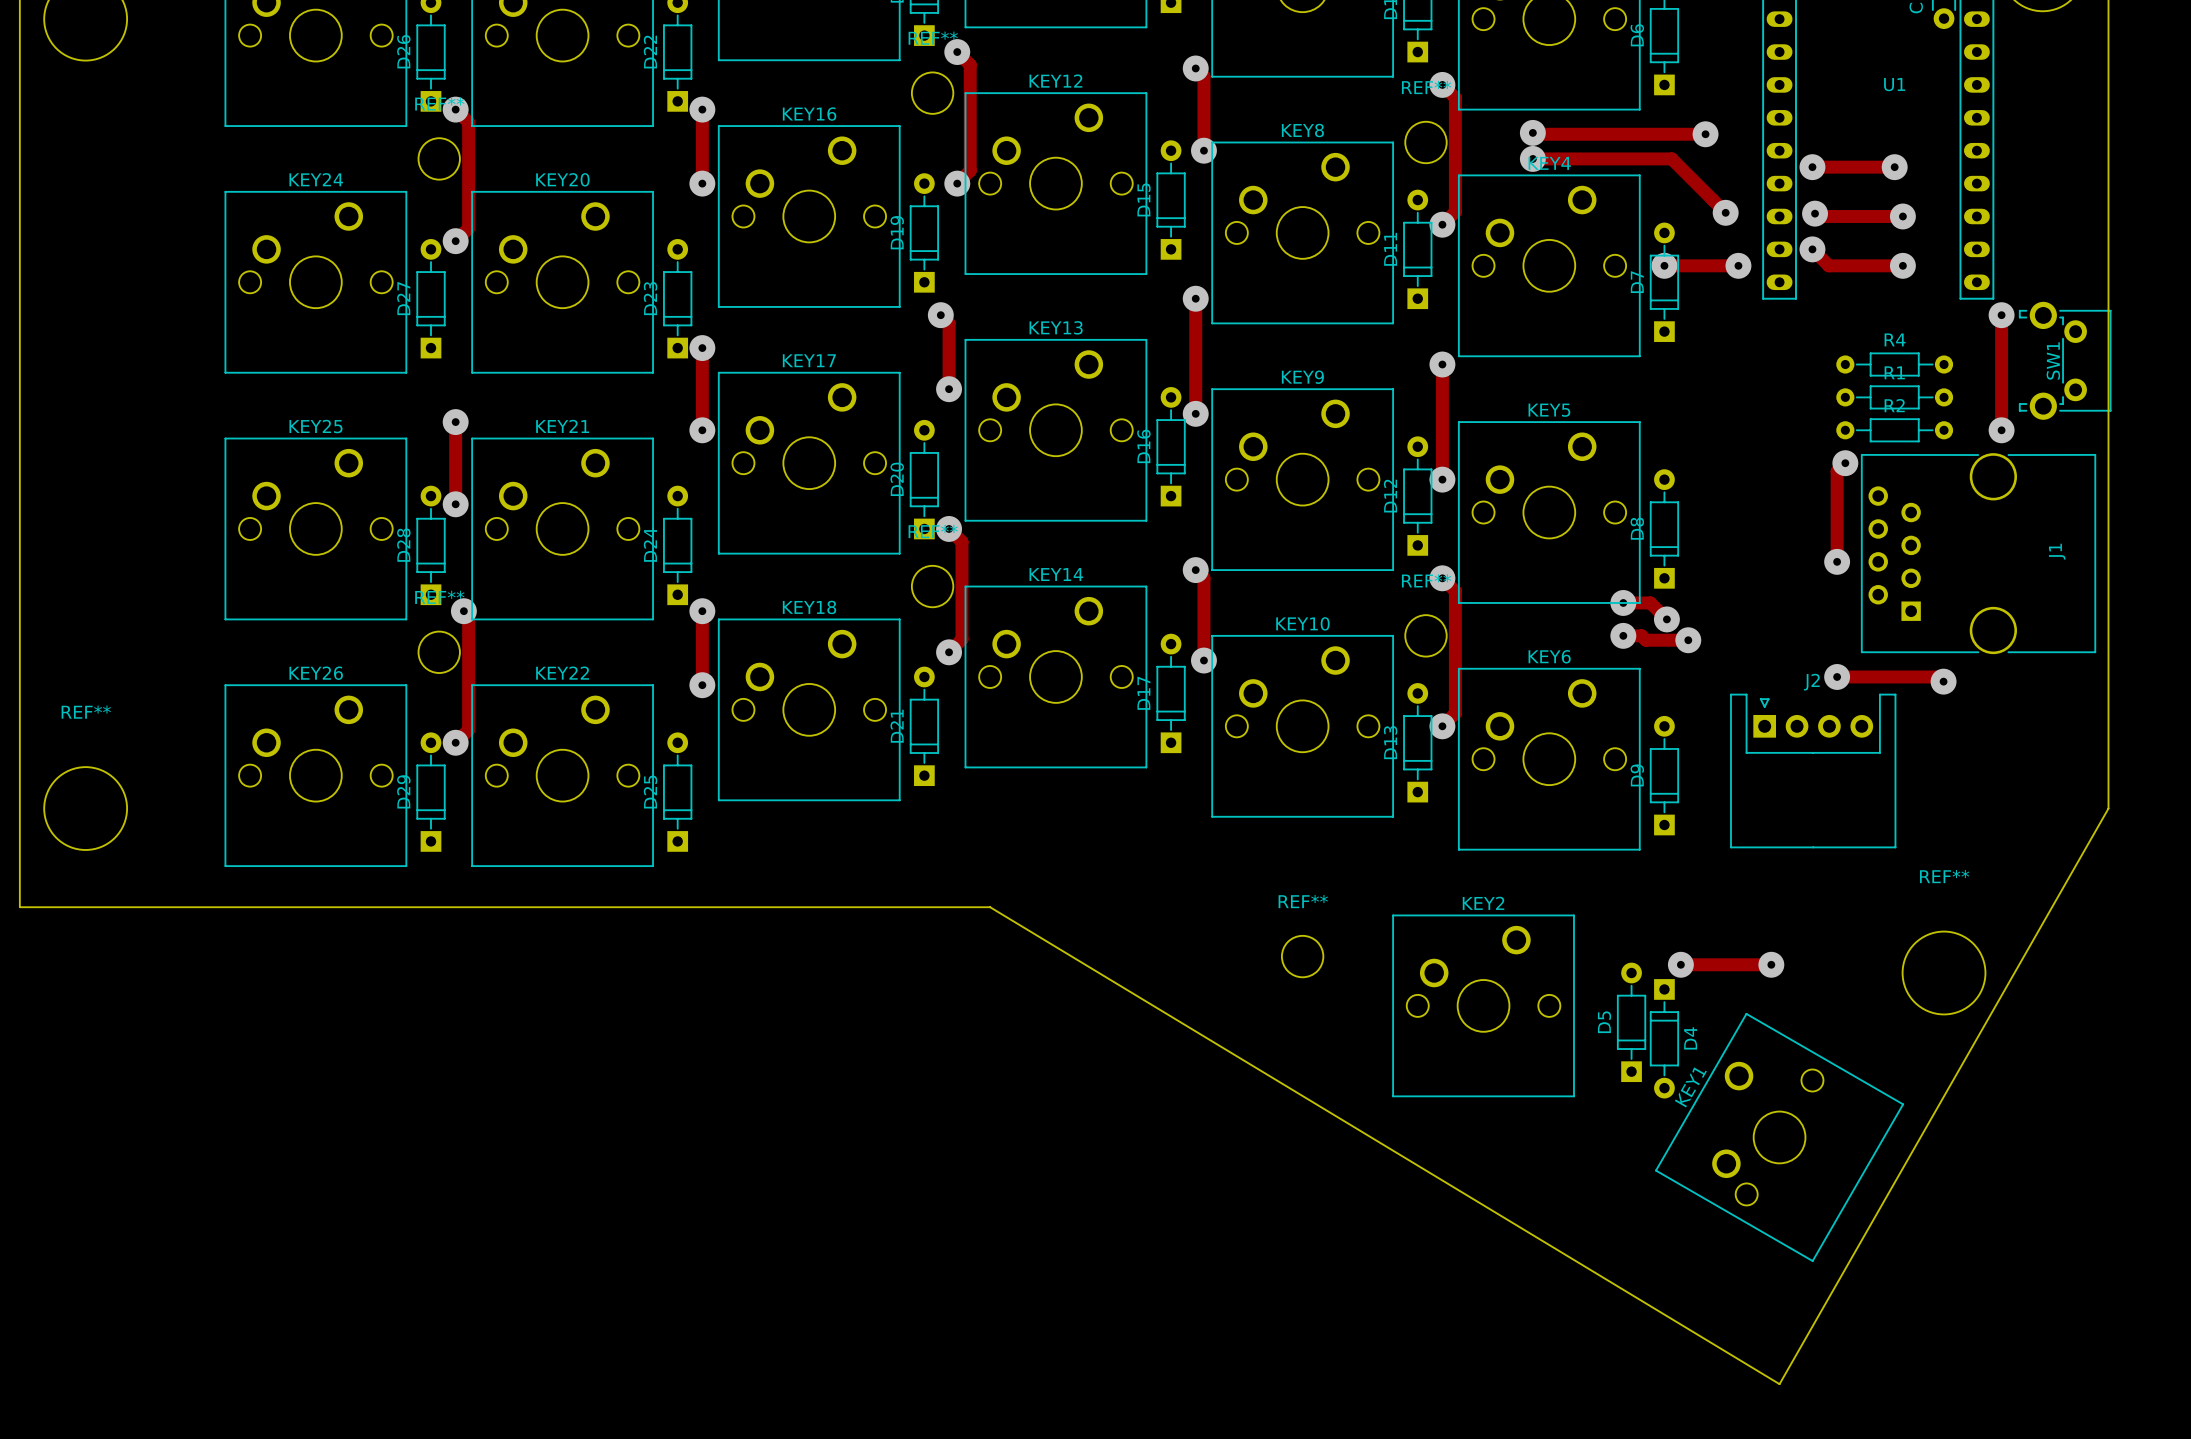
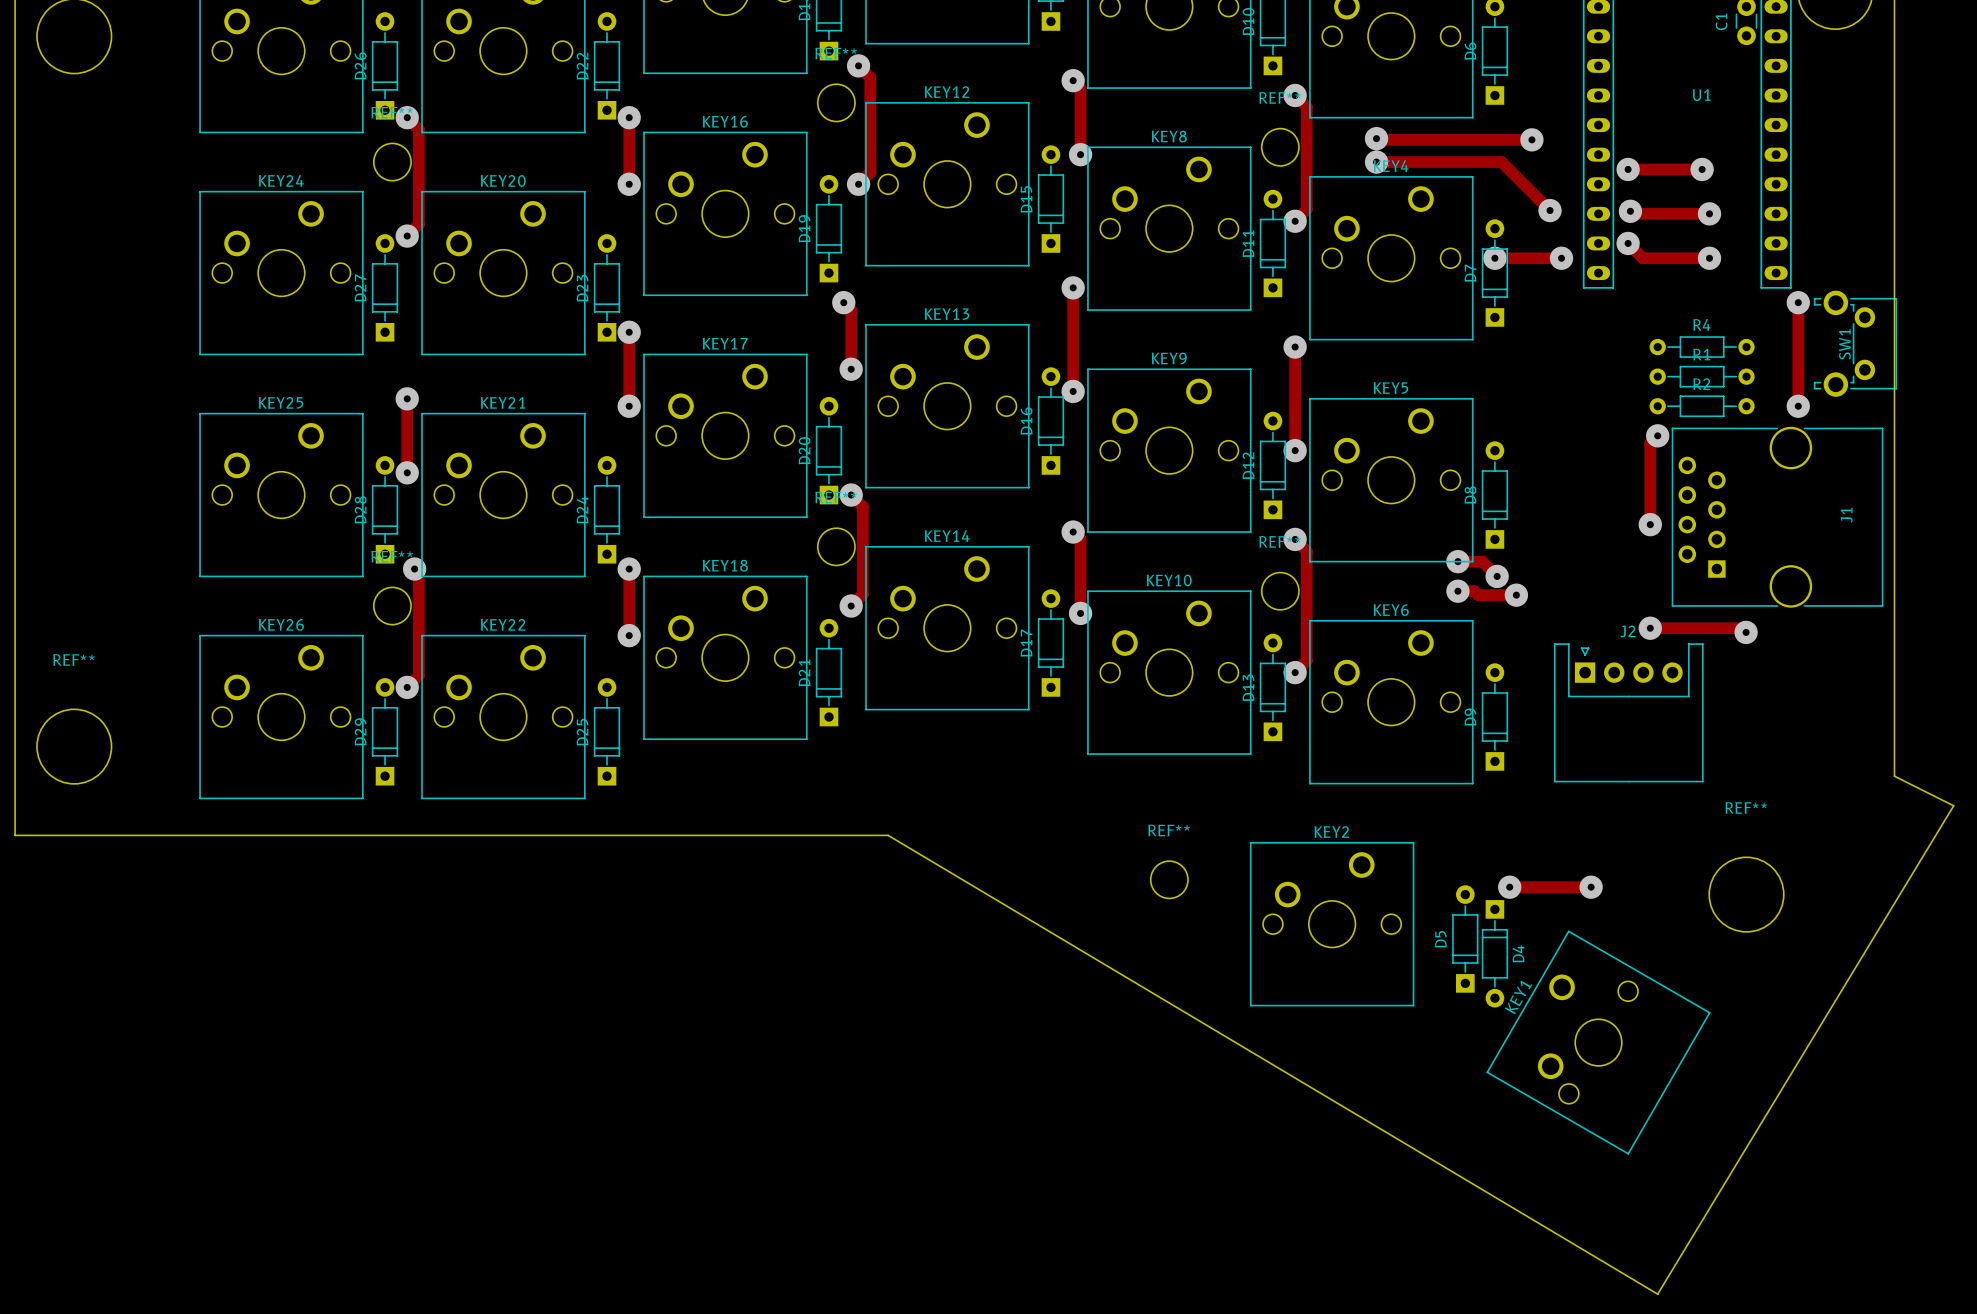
board edge: (2108, 808) (1779, 1384) (990, 907) -> (1894, 746) (1894, 776) (1953, 805) (1657, 1294) (888, 835)

